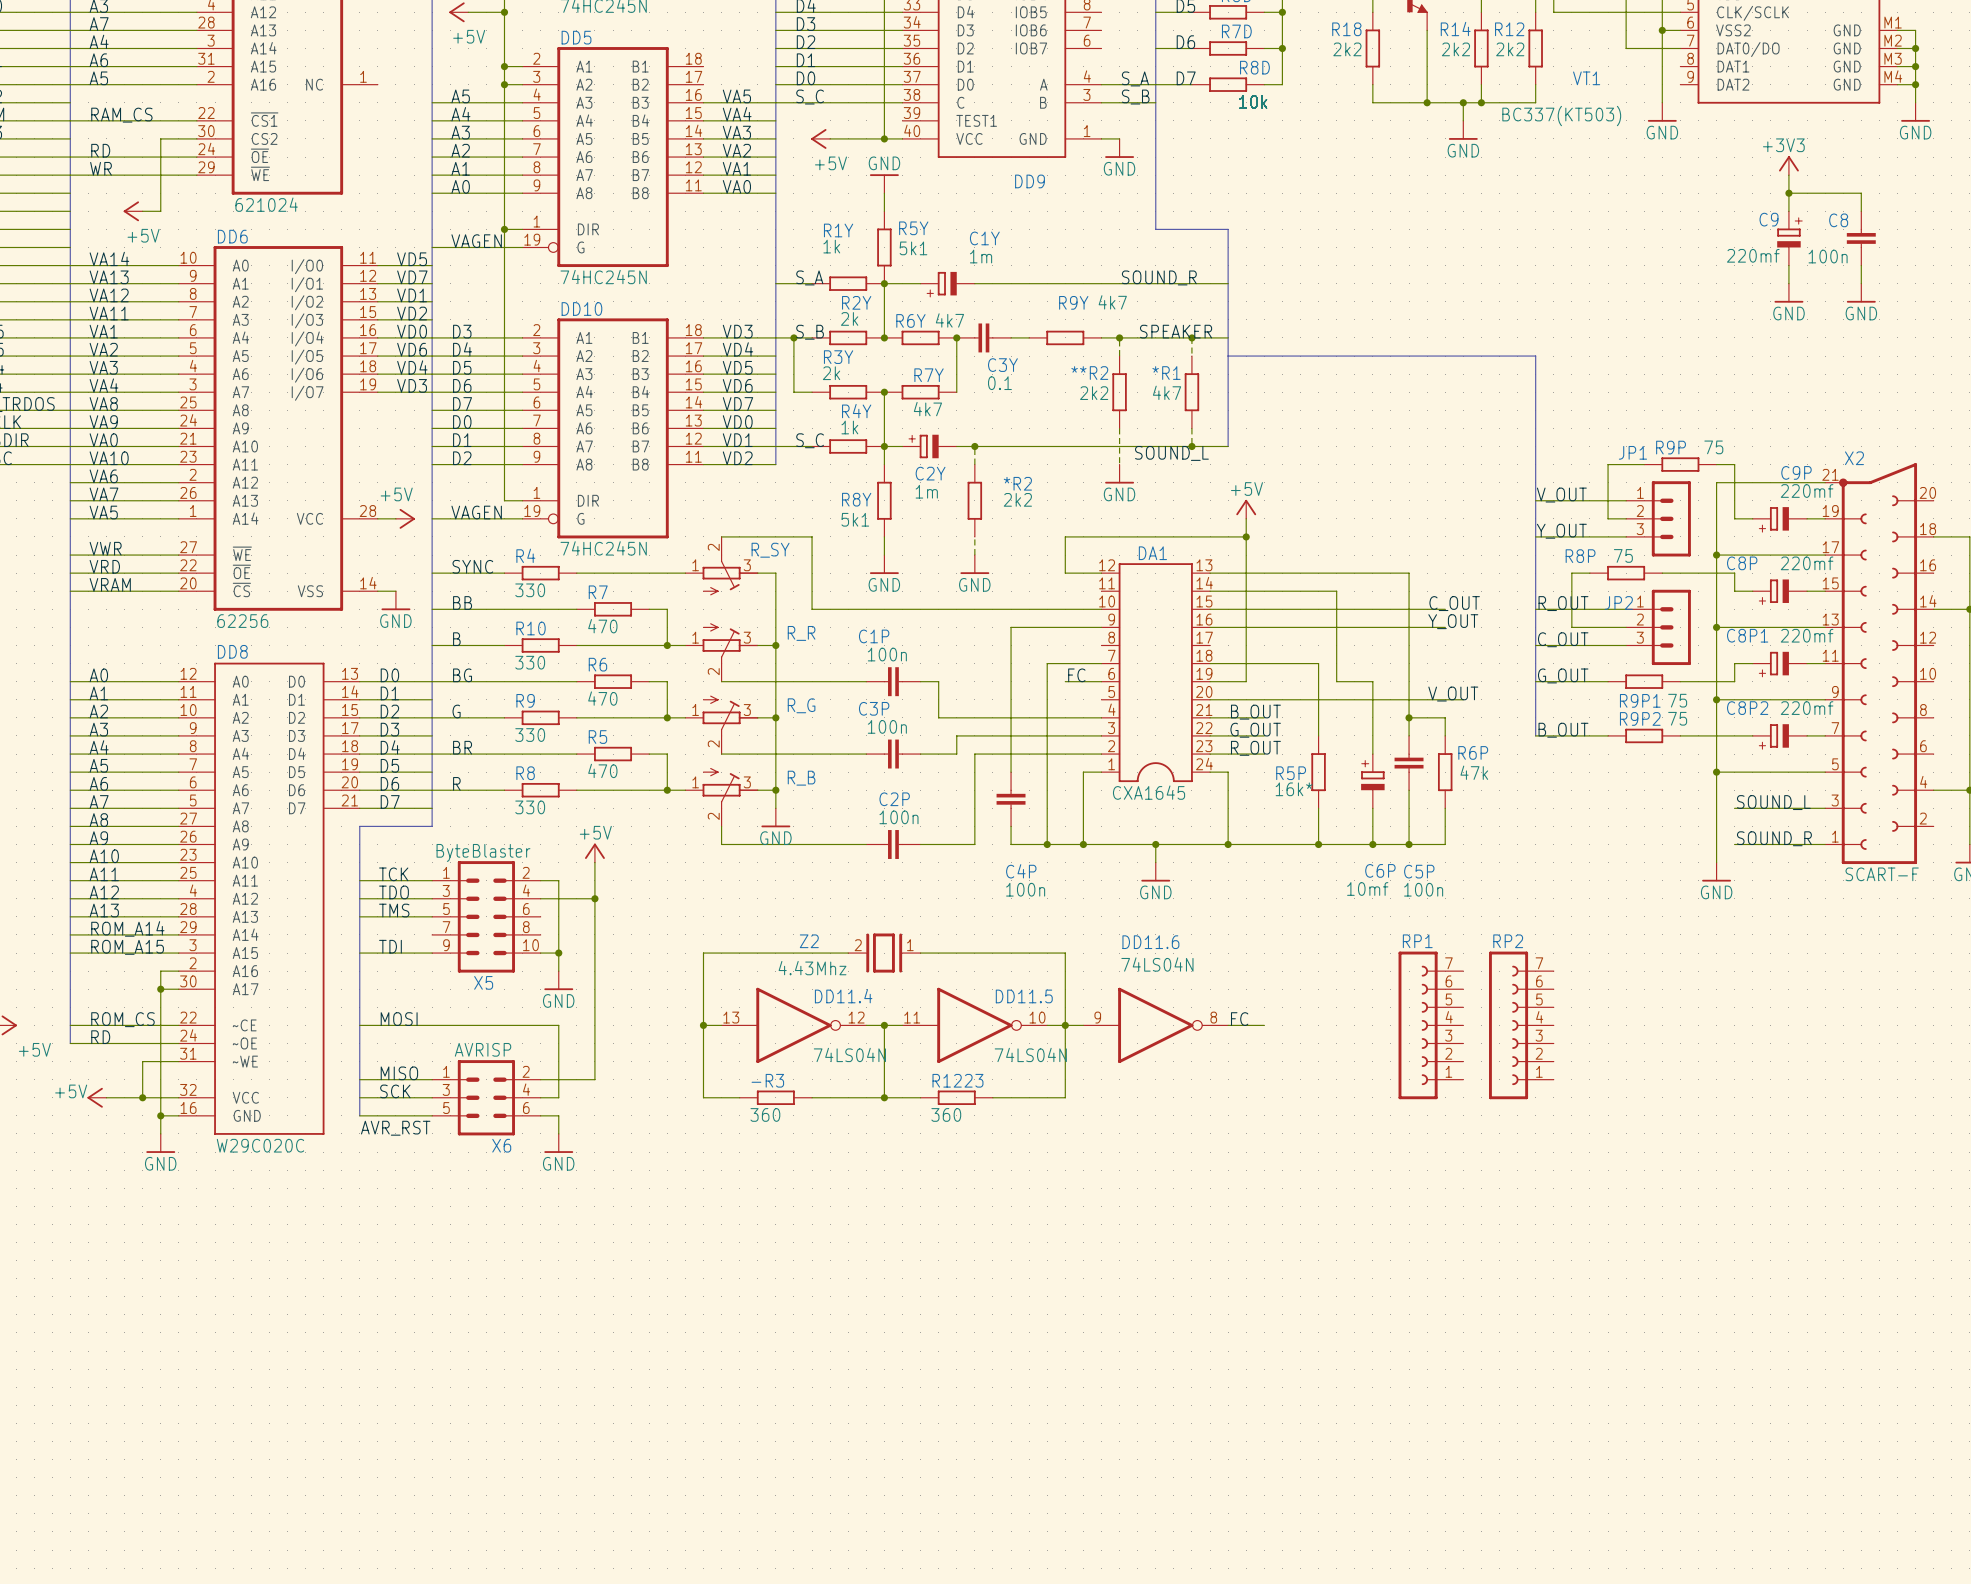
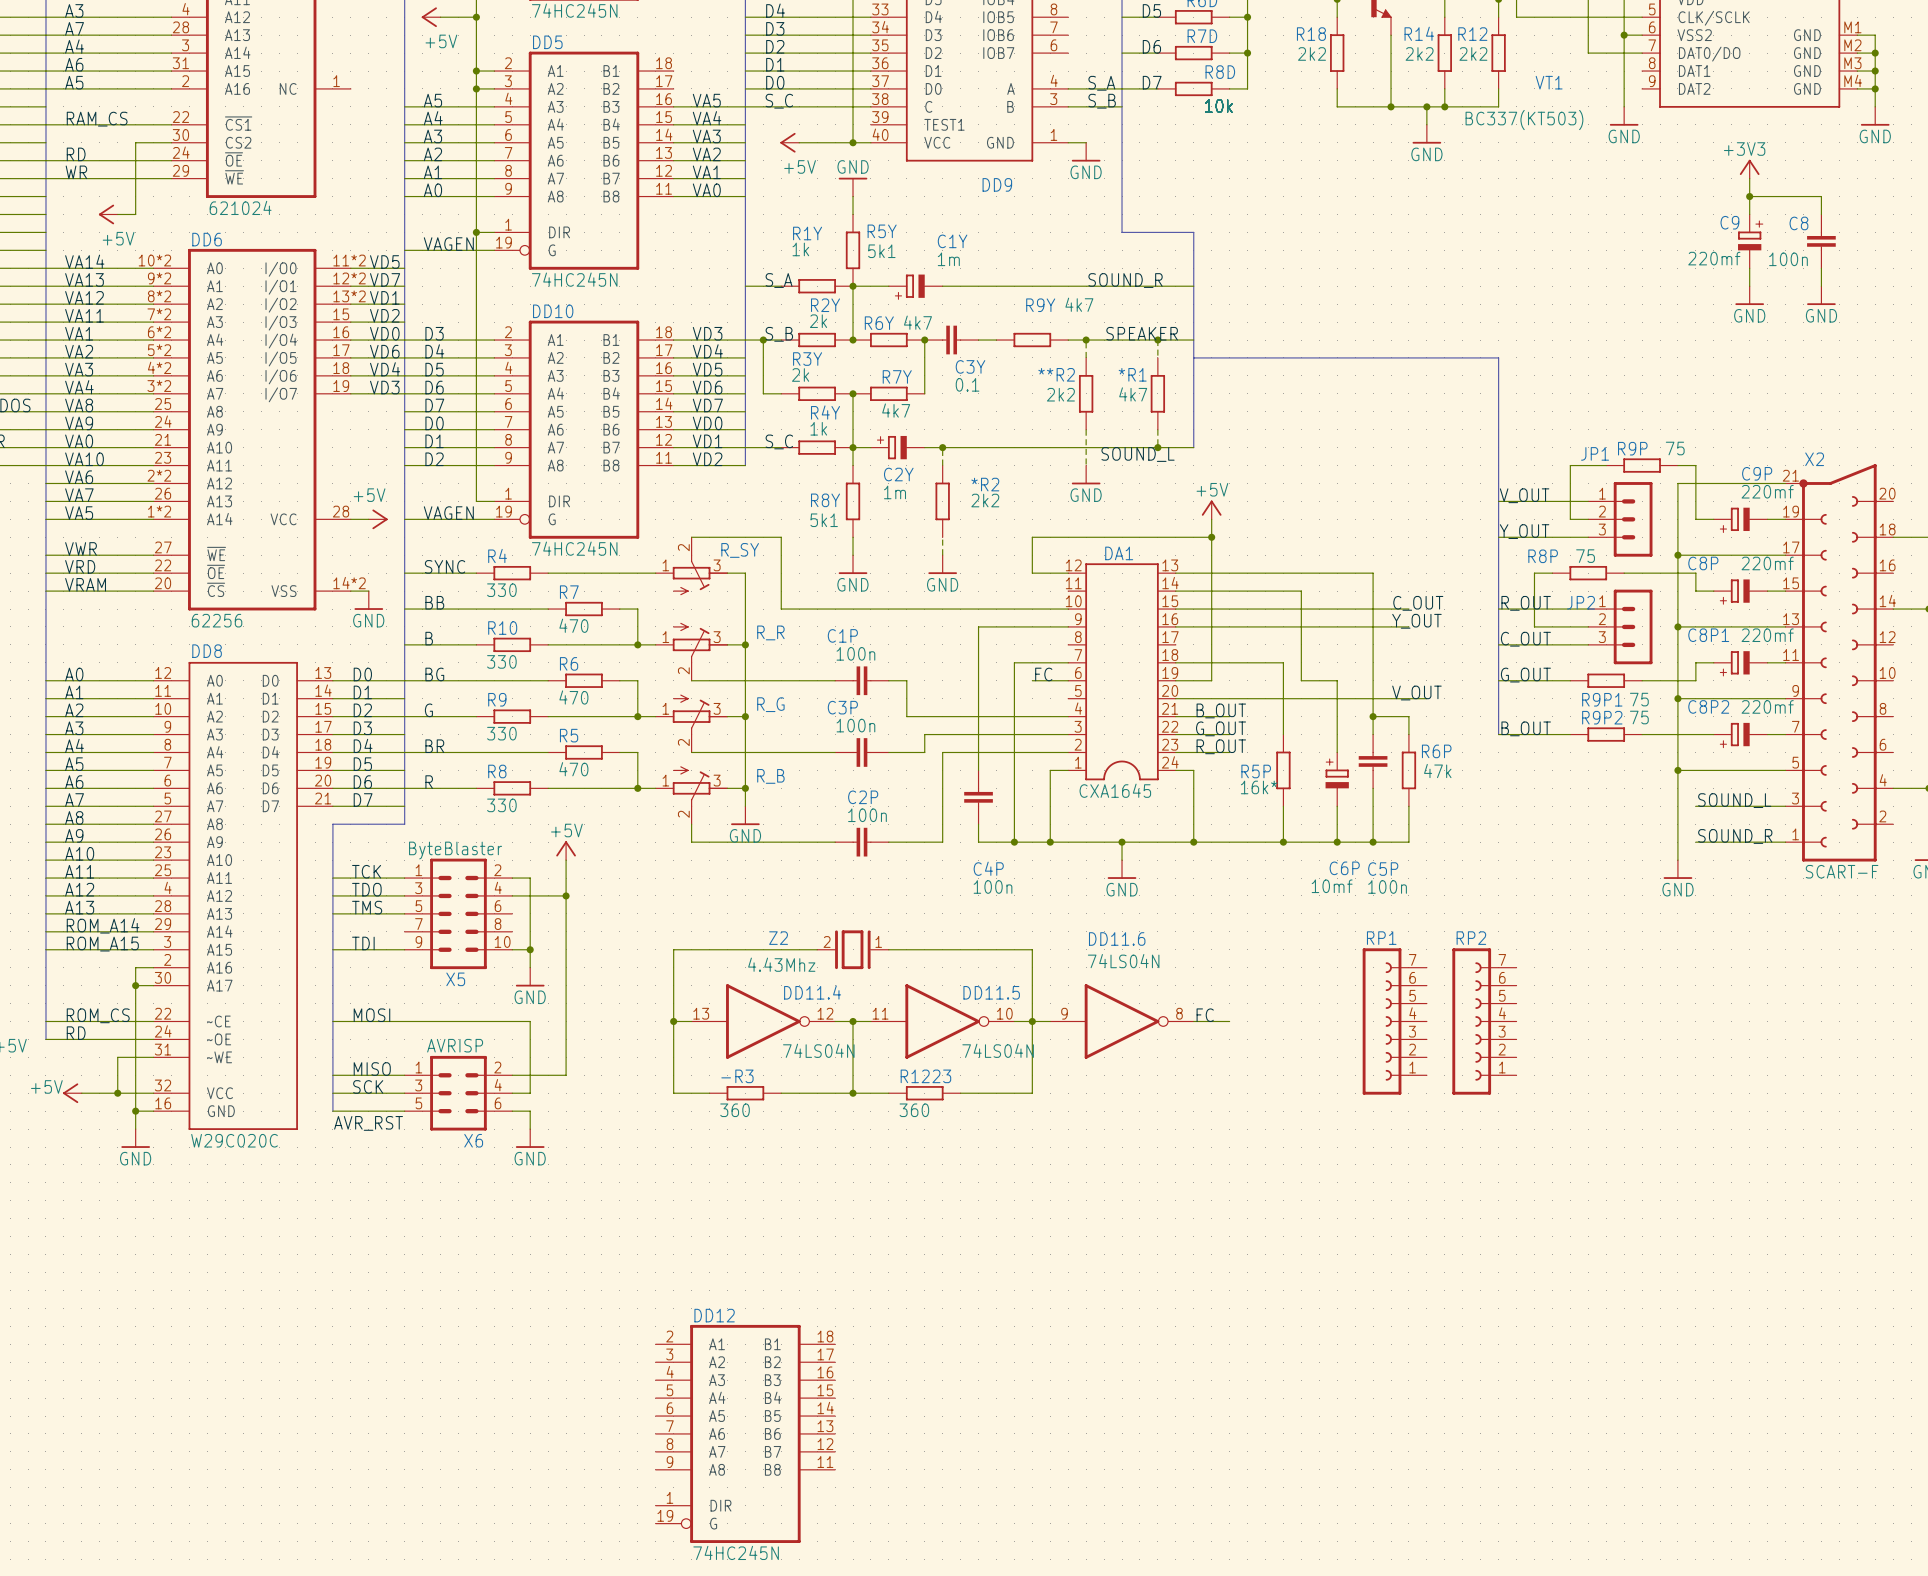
DD6 symbol: [178, 246, 378, 611] -> [153, 248, 351, 611]
DD12: none -> 74HC245N (745, 1433)

